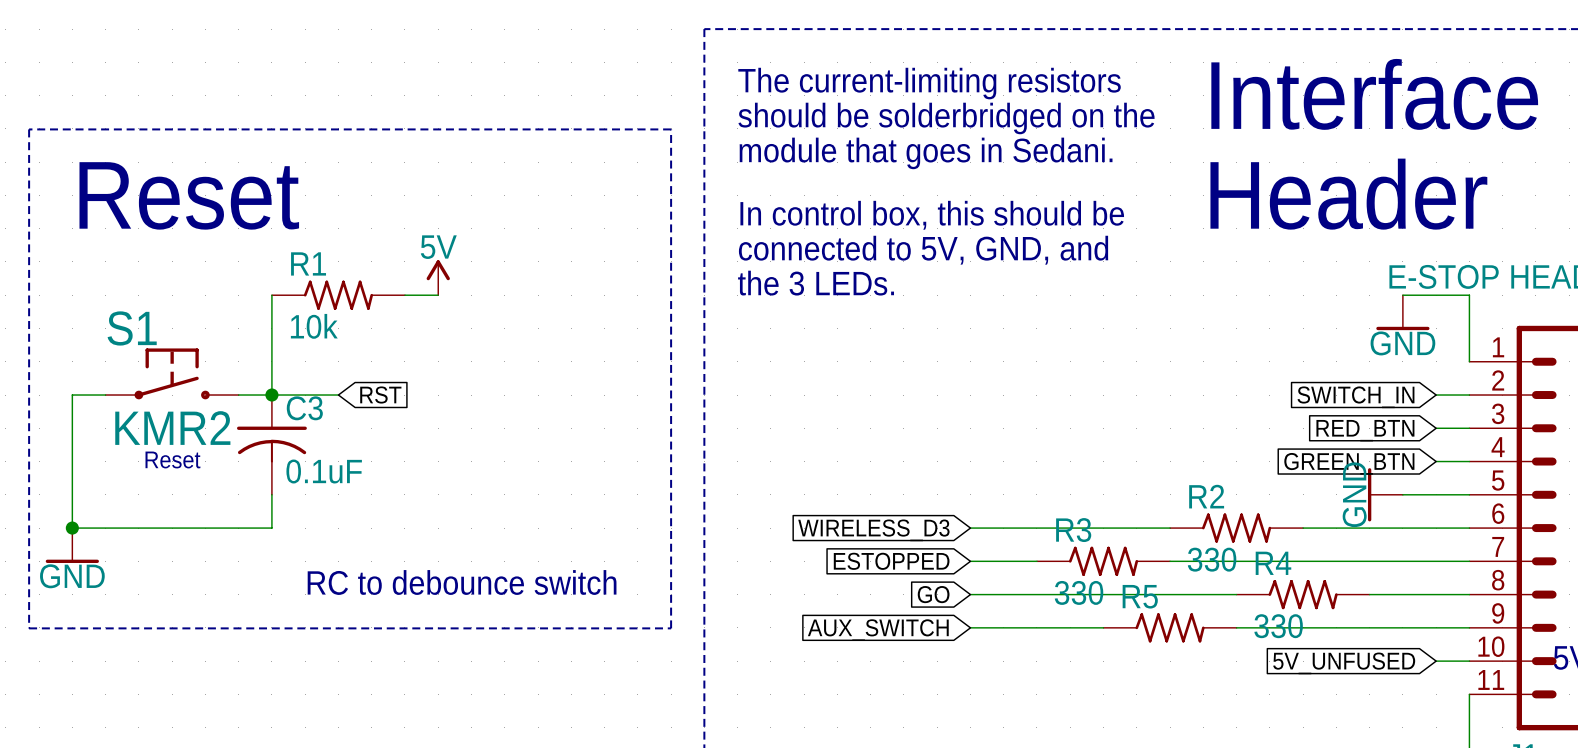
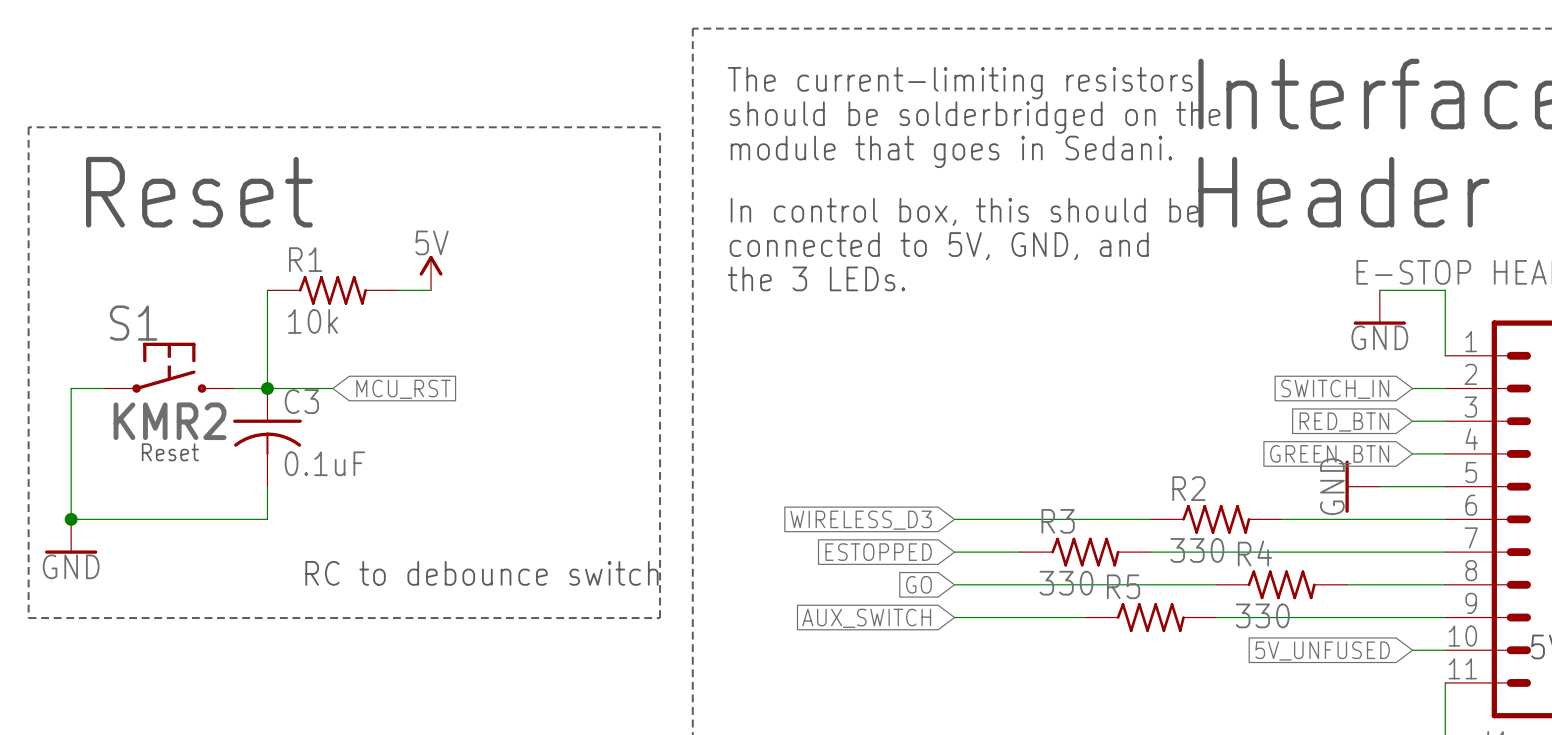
global label: RST (380, 395) -> MCU_RST (403, 389)

